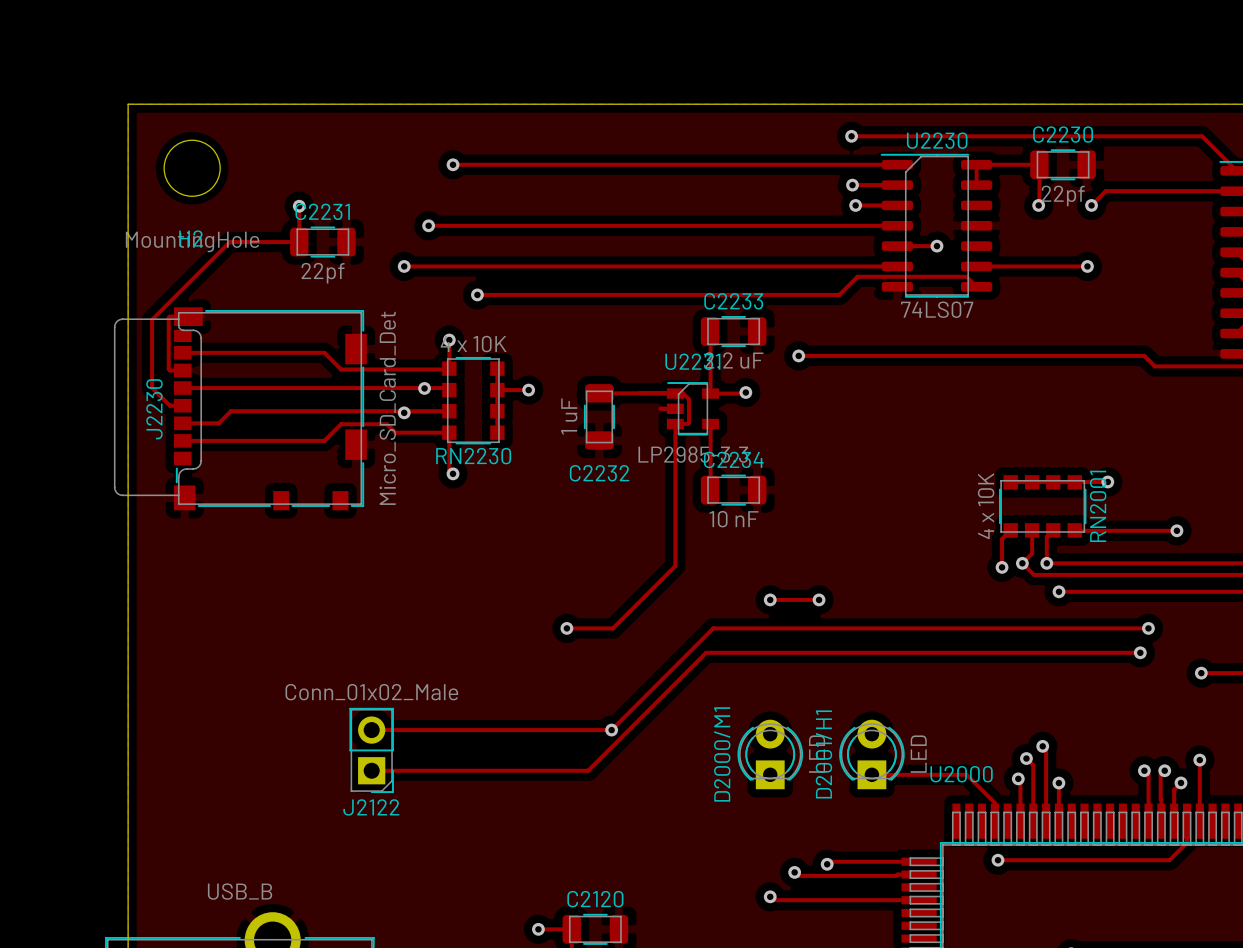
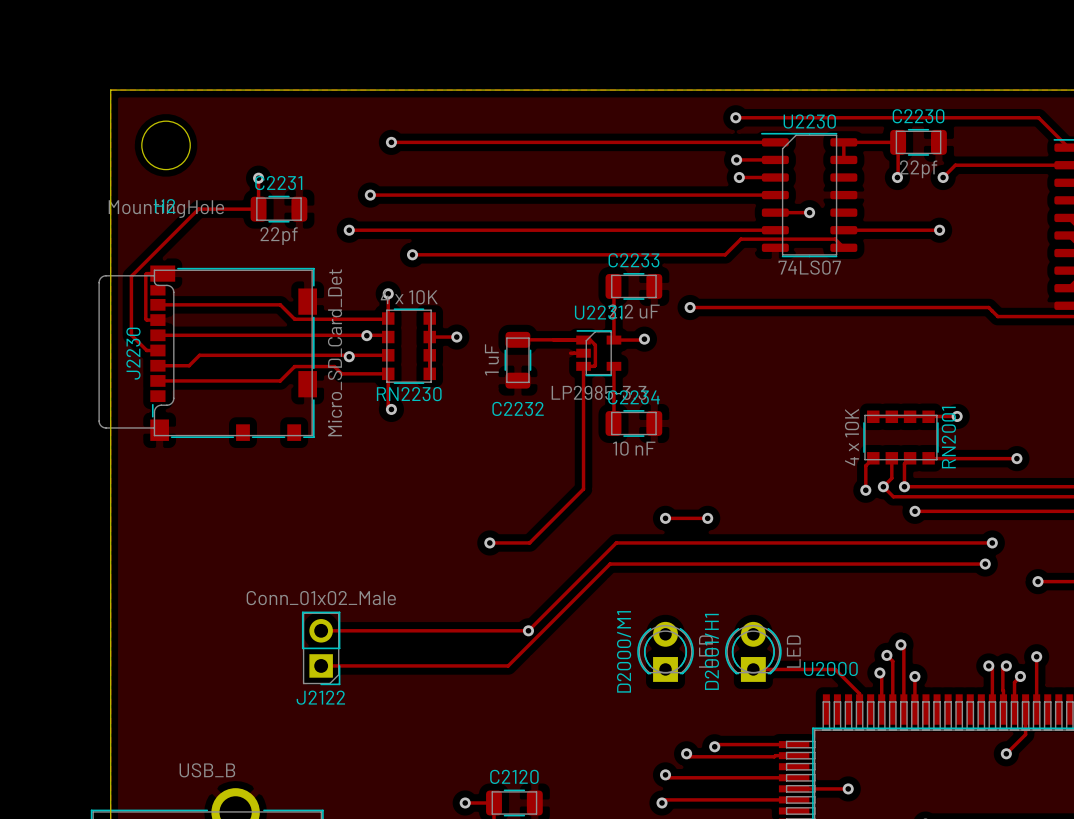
track: (1186, 842) (1169, 860) (997, 860) -> (1025, 728) (1025, 734) (1006, 753)
via position: (997, 860) -> (848, 788)
via: none -> (1006, 753)
track: none -> (794, 788) (848, 788)
track: none -> (794, 799) (665, 799) (662, 802)
via: none -> (662, 802)

